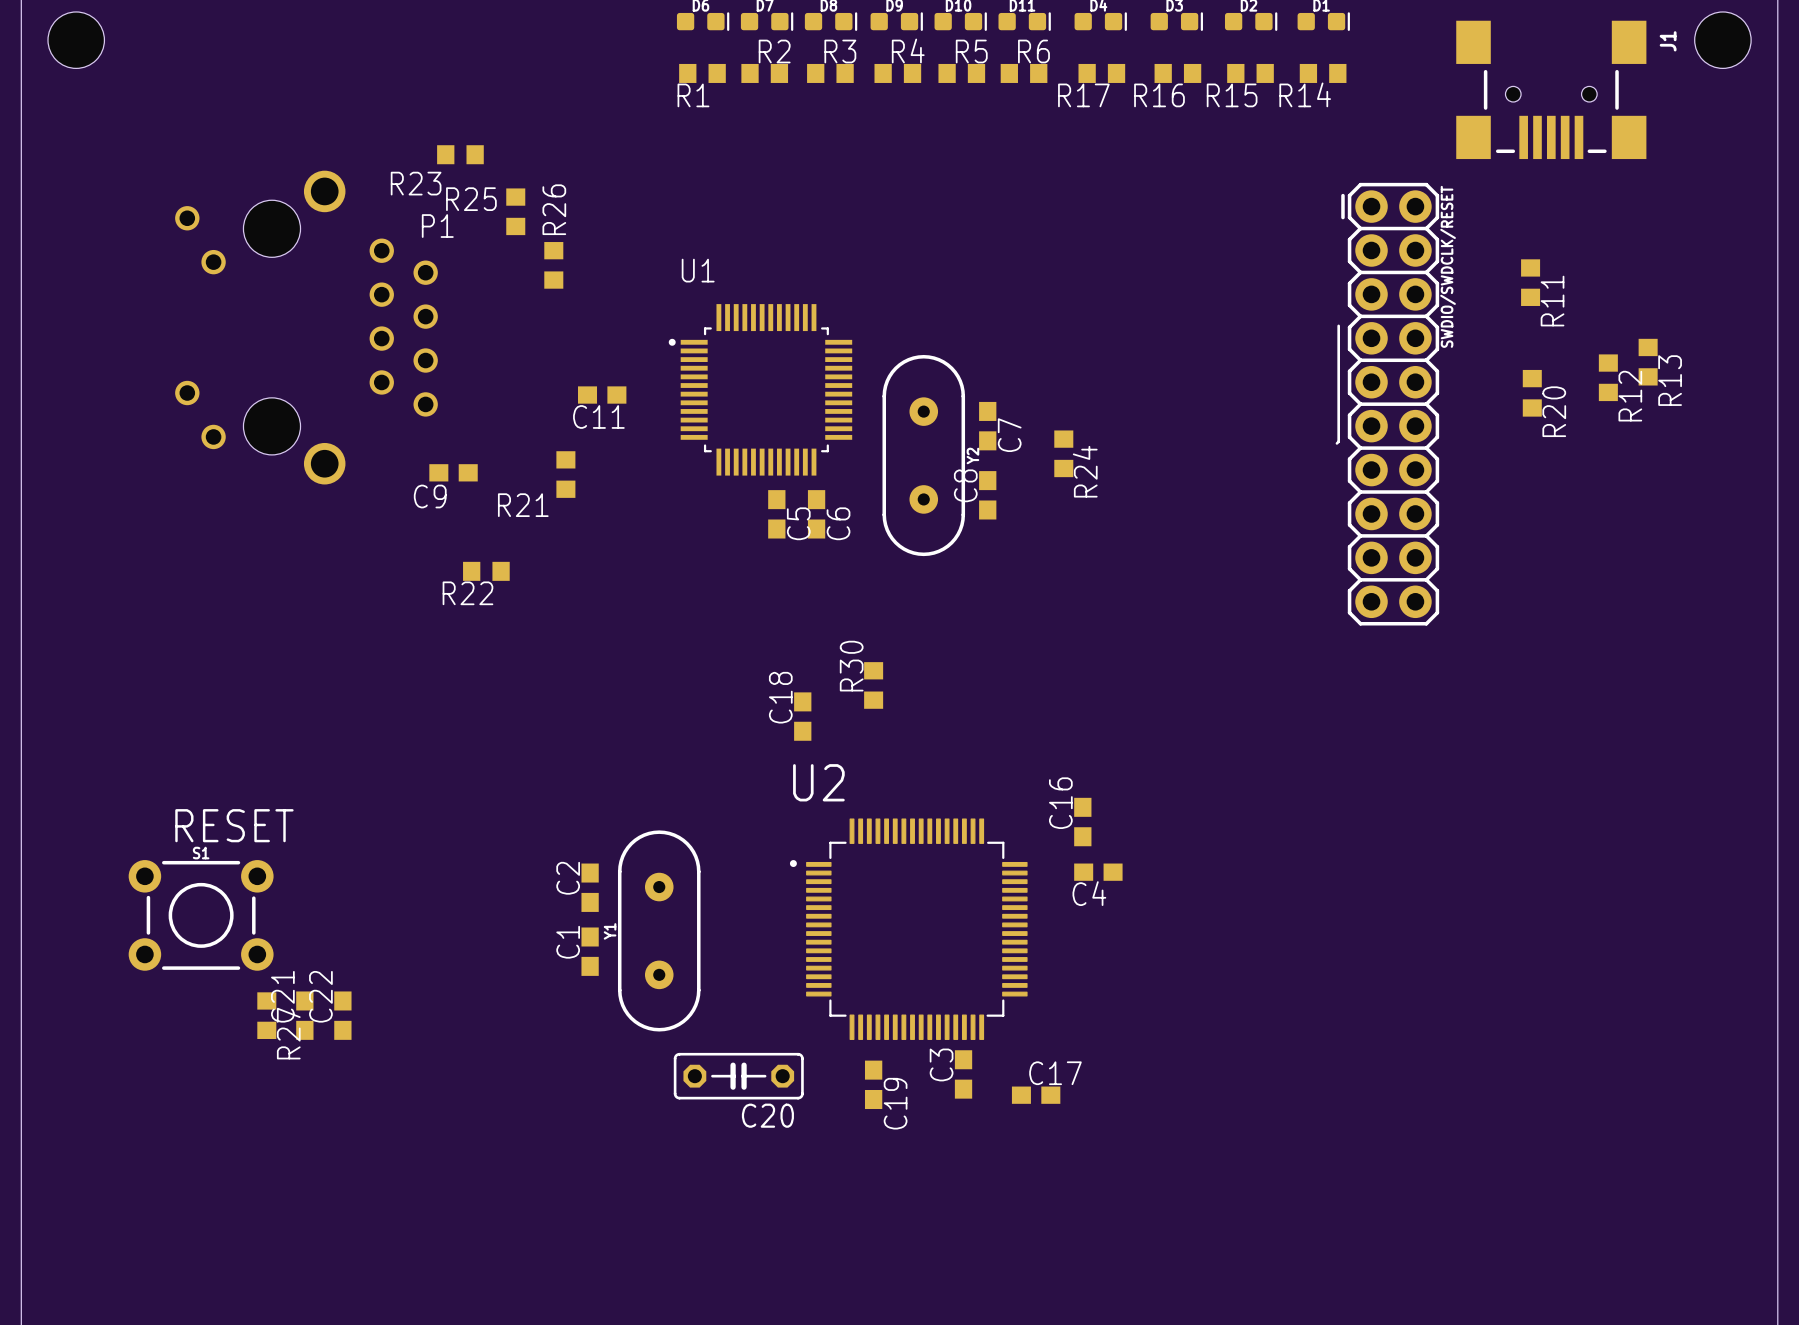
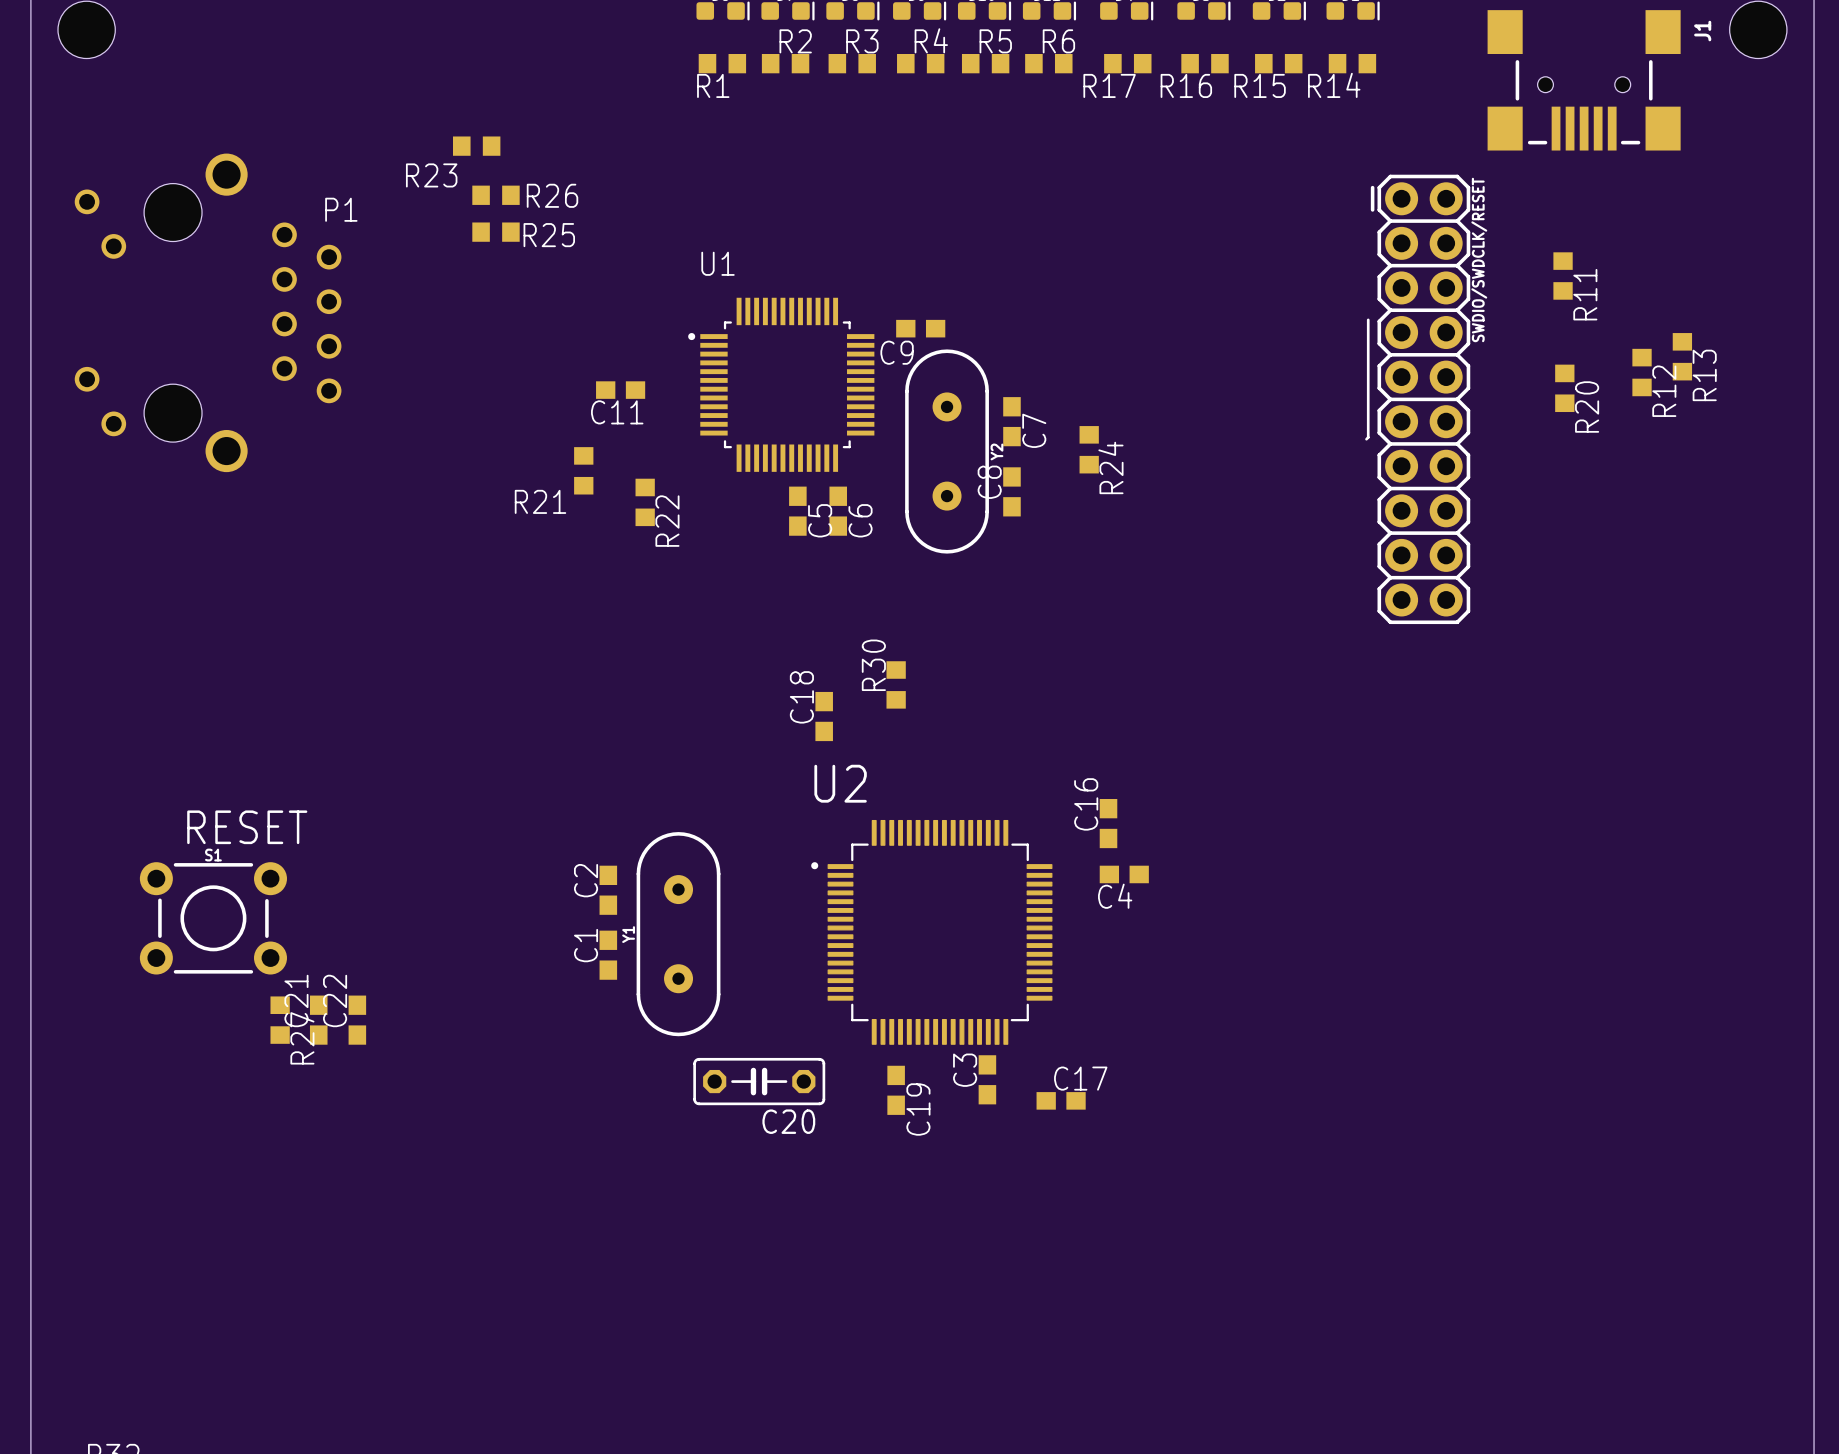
R25 name position: R25 (471, 199) -> R25 (549, 235)
R25 rotation: 0° (515, 211) -> 90° clockwise (496, 232)
R25 position: (515, 211) -> (496, 232)
R26 rotation: 0° (553, 265) -> 90° clockwise (496, 195)
R26 position: (553, 265) -> (496, 195)
P1 position: (306, 327) -> (208, 312)
C9 position: (453, 472) -> (920, 328)
R22 rotation: 0° (486, 571) -> 90° clockwise (645, 502)
R22 position: (486, 571) -> (645, 502)
R22 name position: R22 (467, 593) -> R22 (667, 521)

